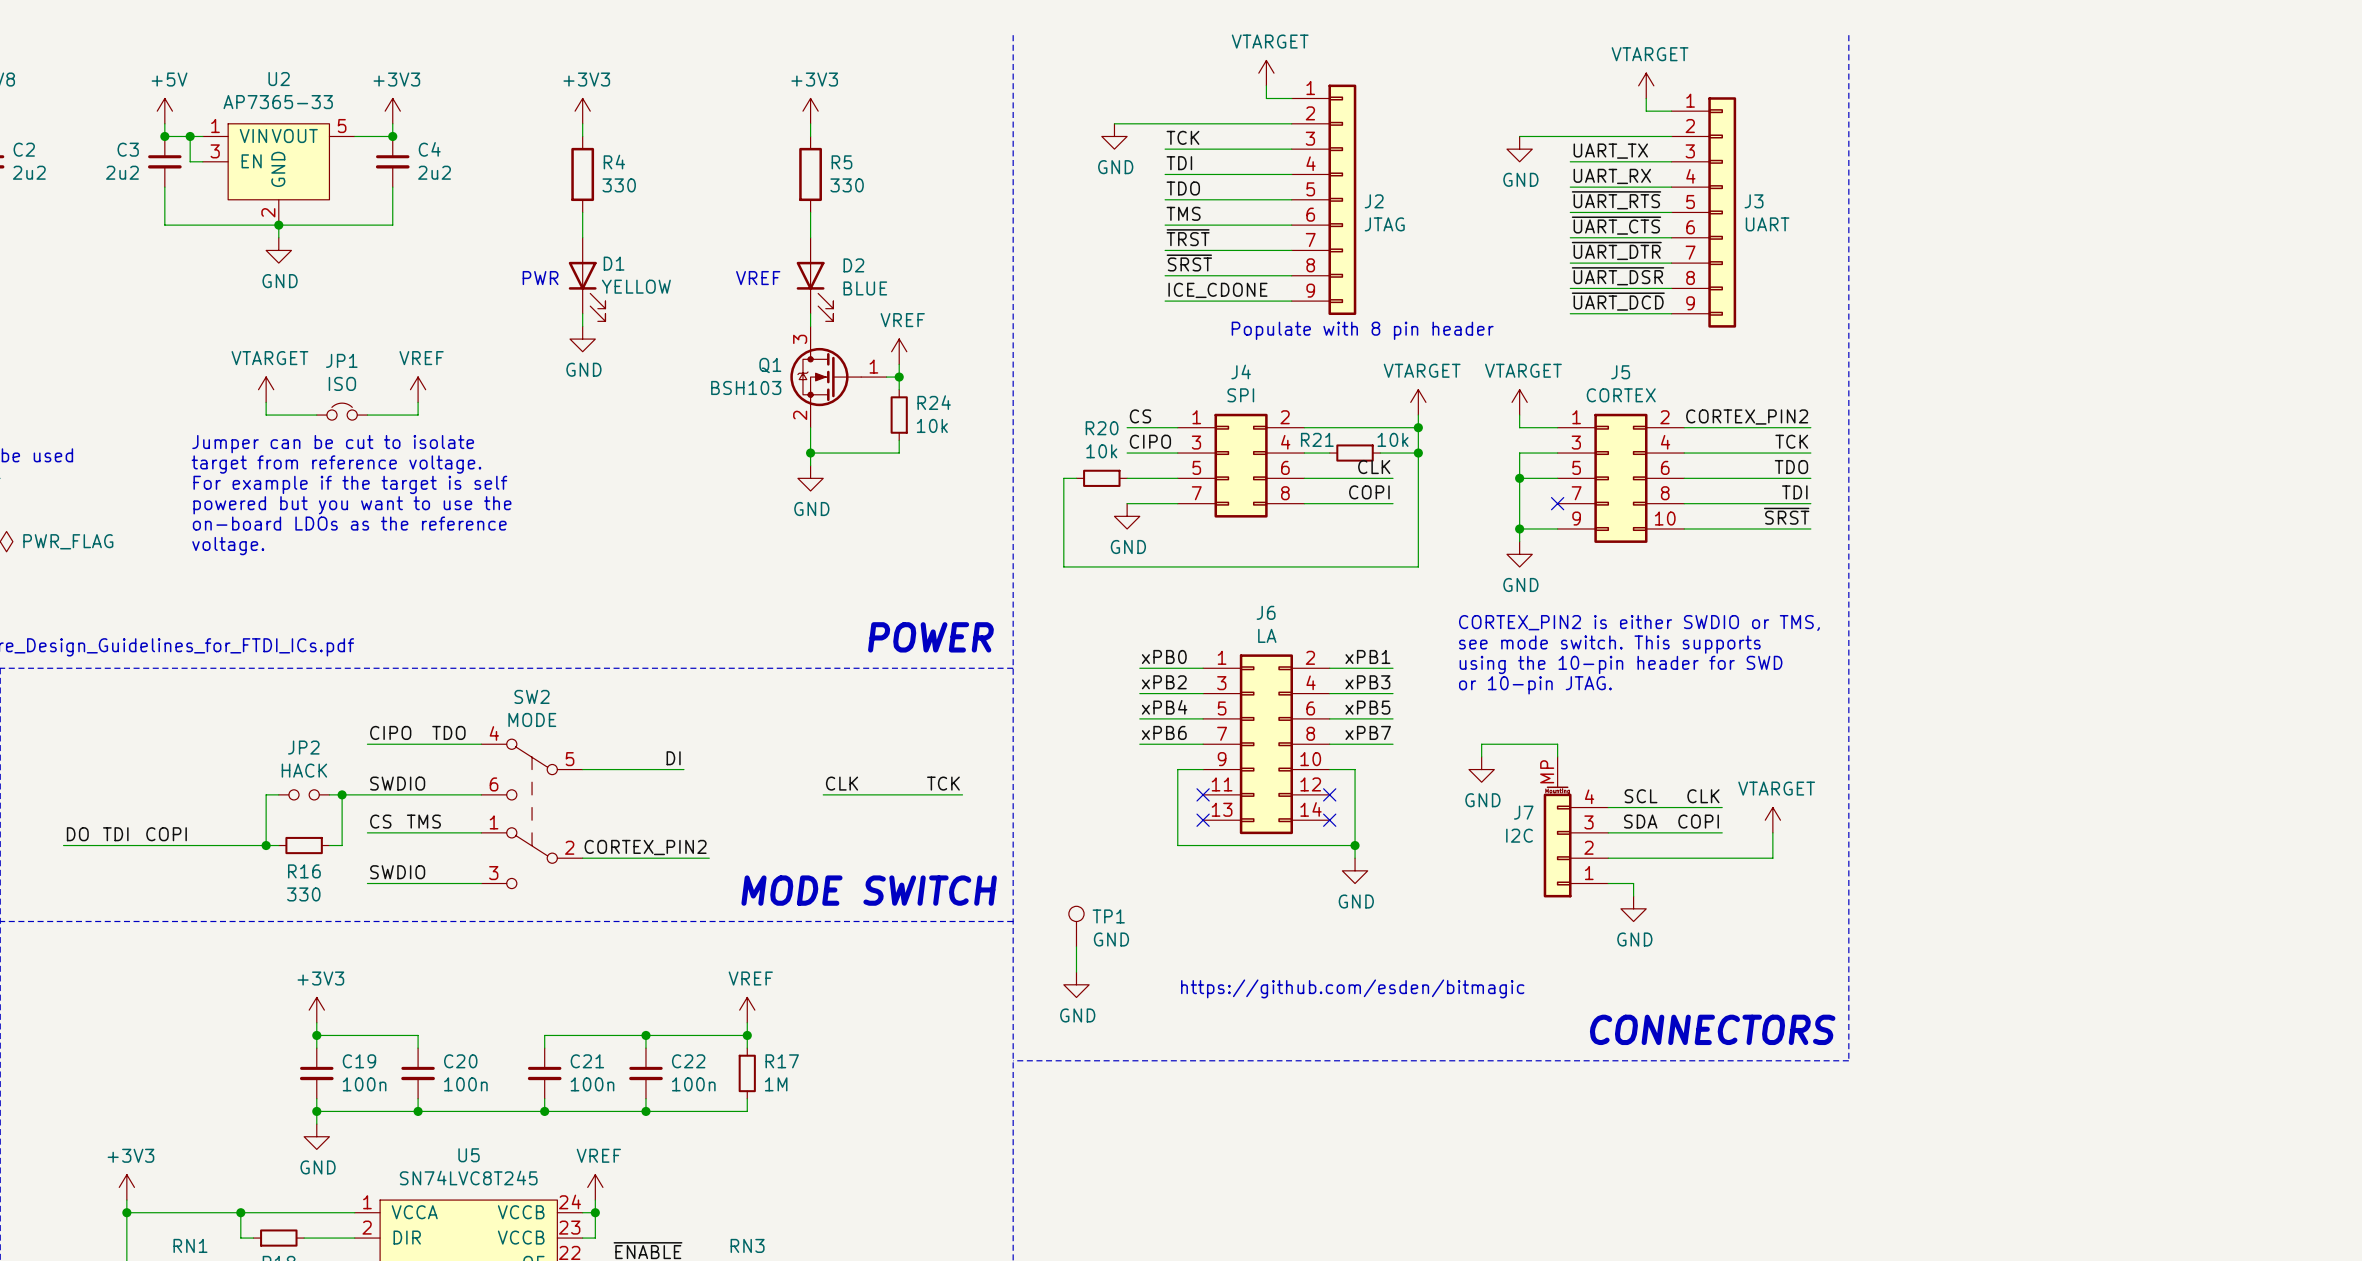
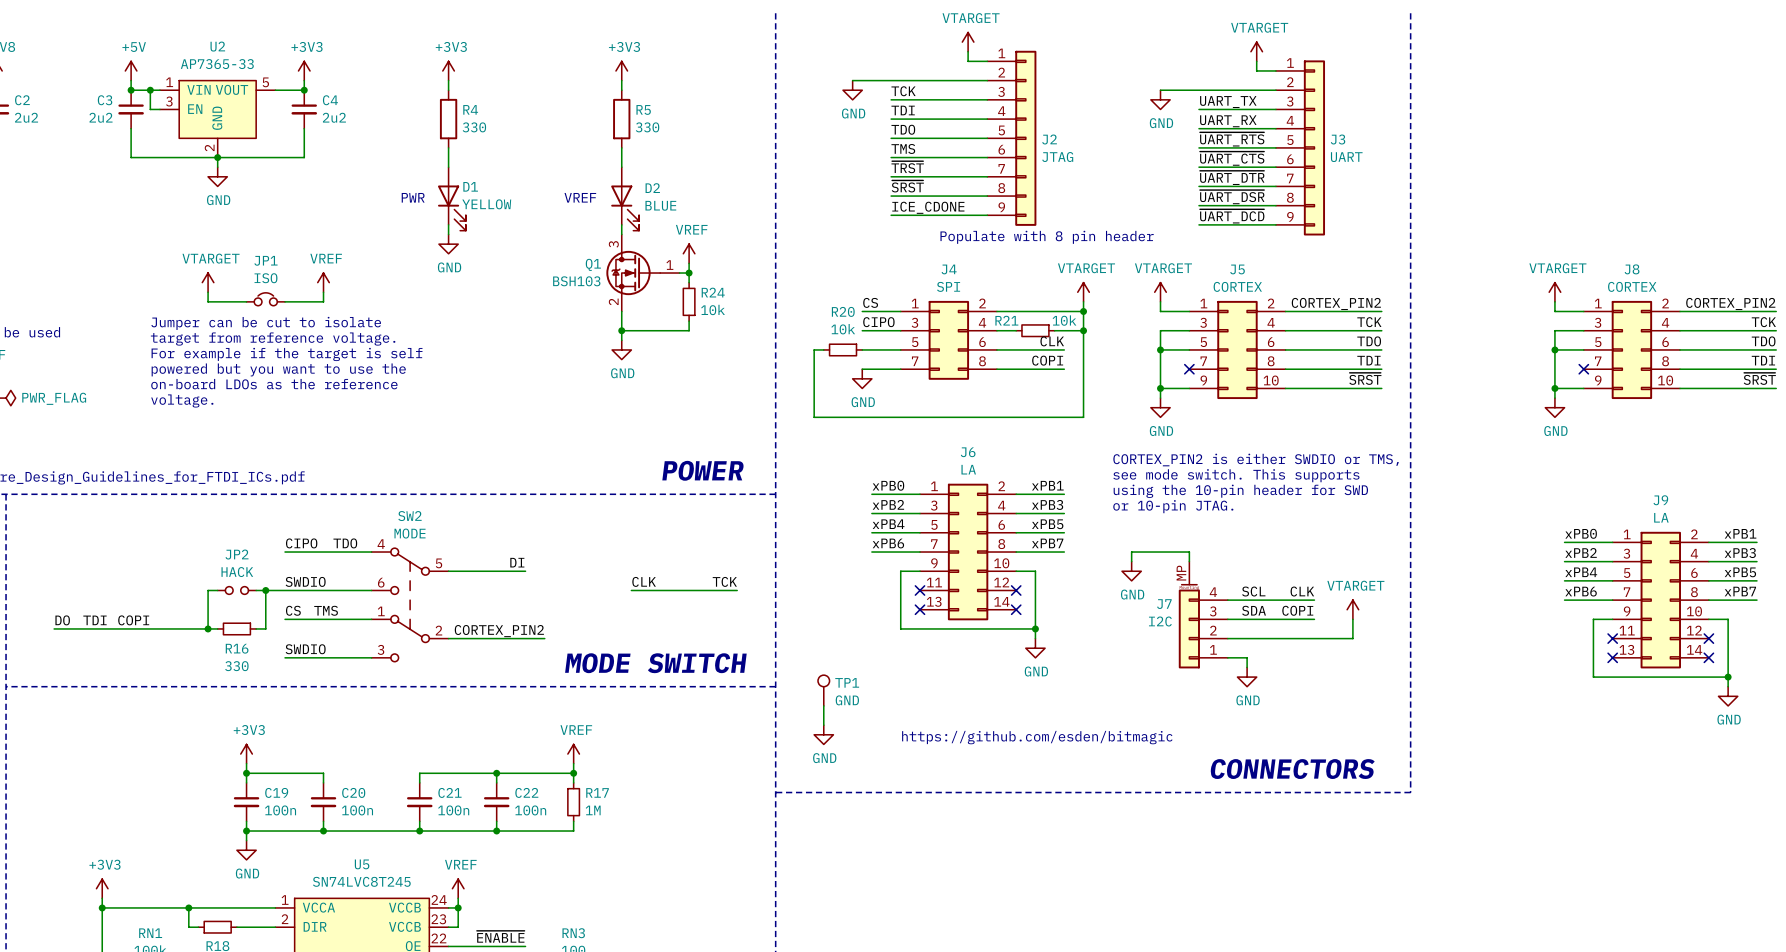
power symbol: none -> VTARGET (1554, 292)
wire: none -> (1554, 301) (1554, 311) (1583, 311)
label: none -> CORTEX_PIN2 (1730, 303)
wire: none -> (1680, 311) (1776, 311)
label: none -> TCK (1763, 322)
wire: none -> (1583, 330) (1554, 330) (1554, 398)
wire: none -> (1680, 330) (1776, 330)
label: none -> TDO (1763, 341)
wire: none -> (1554, 349) (1583, 349)
junction: none -> (1554, 349)
J8: none -> CORTEX (1631, 349)
wire: none -> (1680, 349) (1776, 349)
label: none -> TDI (1763, 360)
no-connect mark: none -> (1583, 369)
wire: none -> (1680, 369) (1776, 369)
label: none -> ~{SRST} (1759, 378)
wire: none -> (1554, 388) (1583, 388)
junction: none -> (1554, 388)
wire: none -> (1680, 388) (1776, 388)
power symbol: none -> GND (1554, 407)
label: none -> xPB0 (1581, 533)
label: none -> xPB1 (1740, 533)
wire: none -> (1564, 542) (1612, 542)
wire: none -> (1708, 542) (1756, 542)
label: none -> xPB2 (1581, 552)
label: none -> xPB3 (1740, 553)
wire: none -> (1564, 561) (1612, 561)
wire: none -> (1708, 561) (1756, 561)
label: none -> xPB4 (1581, 572)
label: none -> xPB5 (1740, 572)
wire: none -> (1564, 580) (1612, 580)
wire: none -> (1708, 580) (1756, 580)
label: none -> xPB6 (1581, 591)
label: none -> xPB7 (1740, 591)
wire: none -> (1564, 600) (1612, 600)
J9: none -> LA (1660, 600)
wire: none -> (1708, 600) (1756, 600)
wire: none -> (1612, 619) (1593, 619) (1593, 677) (1728, 677)
wire: none -> (1708, 619) (1728, 619) (1728, 686)
no-connect mark: none -> (1612, 638)
no-connect mark: none -> (1708, 638)
no-connect mark: none -> (1612, 657)
no-connect mark: none -> (1708, 657)
junction: none -> (1728, 677)
power symbol: none -> GND (1728, 696)

